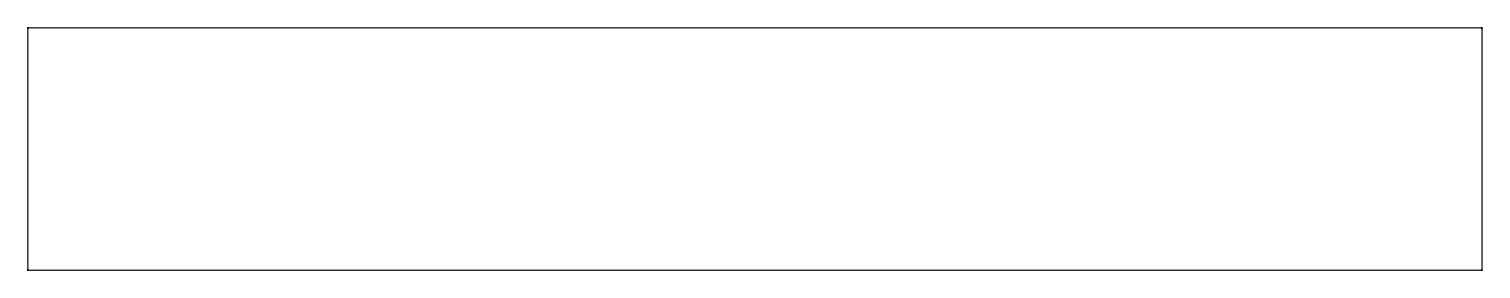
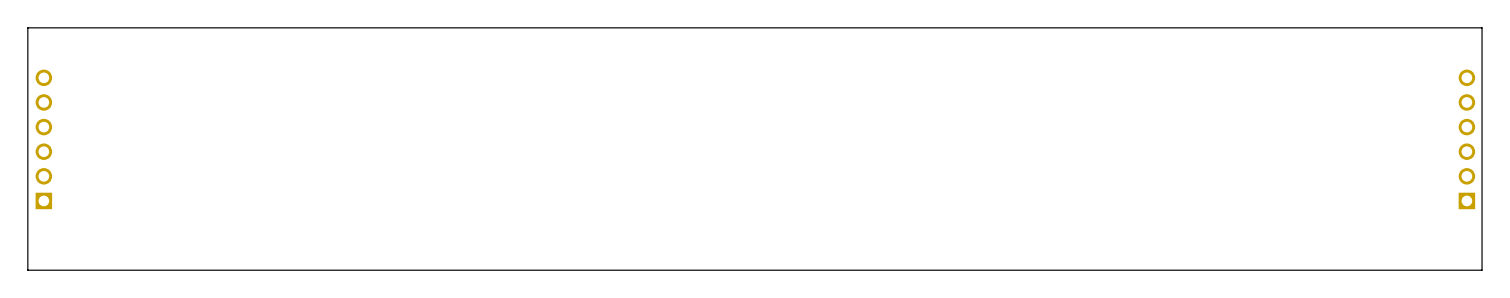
part: none -> (43, 139)
part: none -> (1466, 139)

